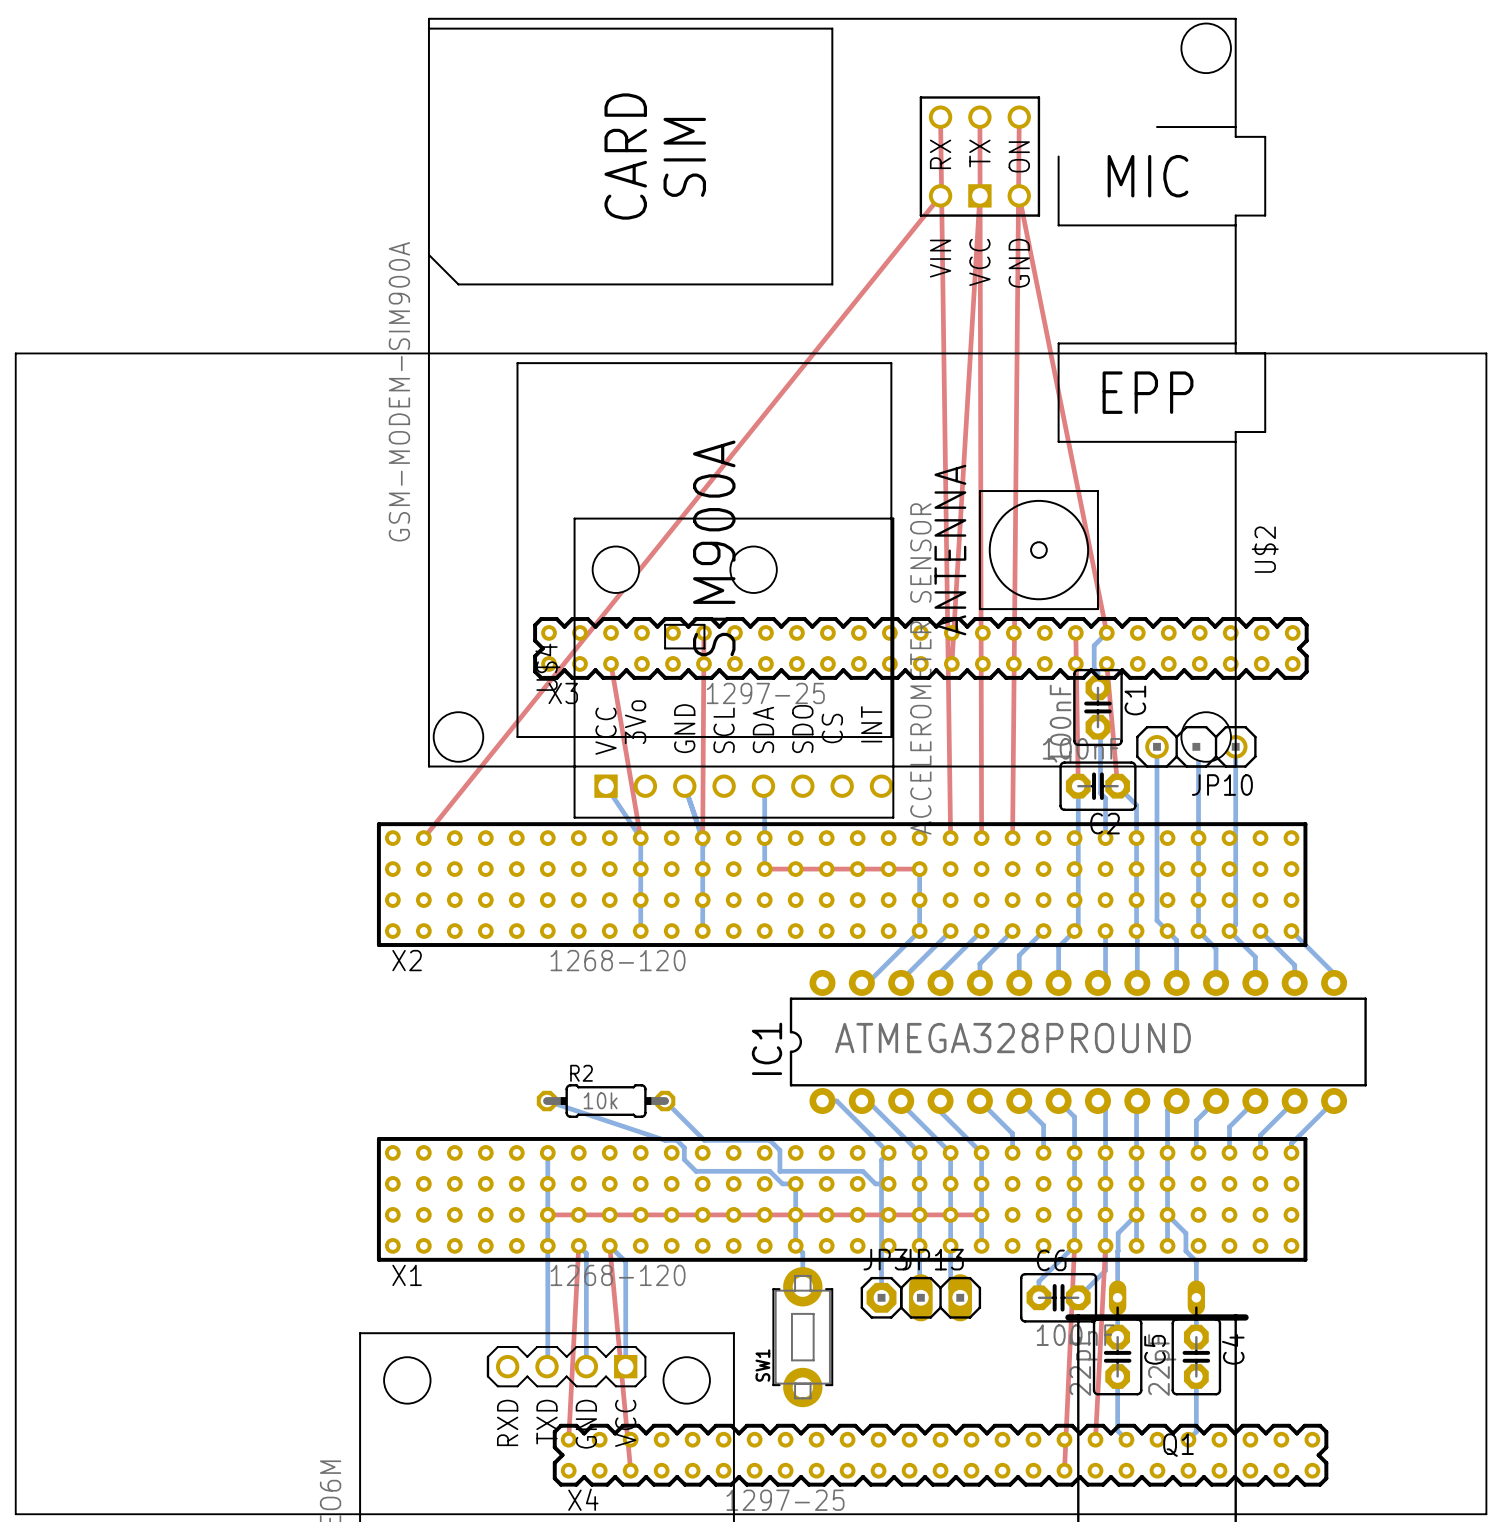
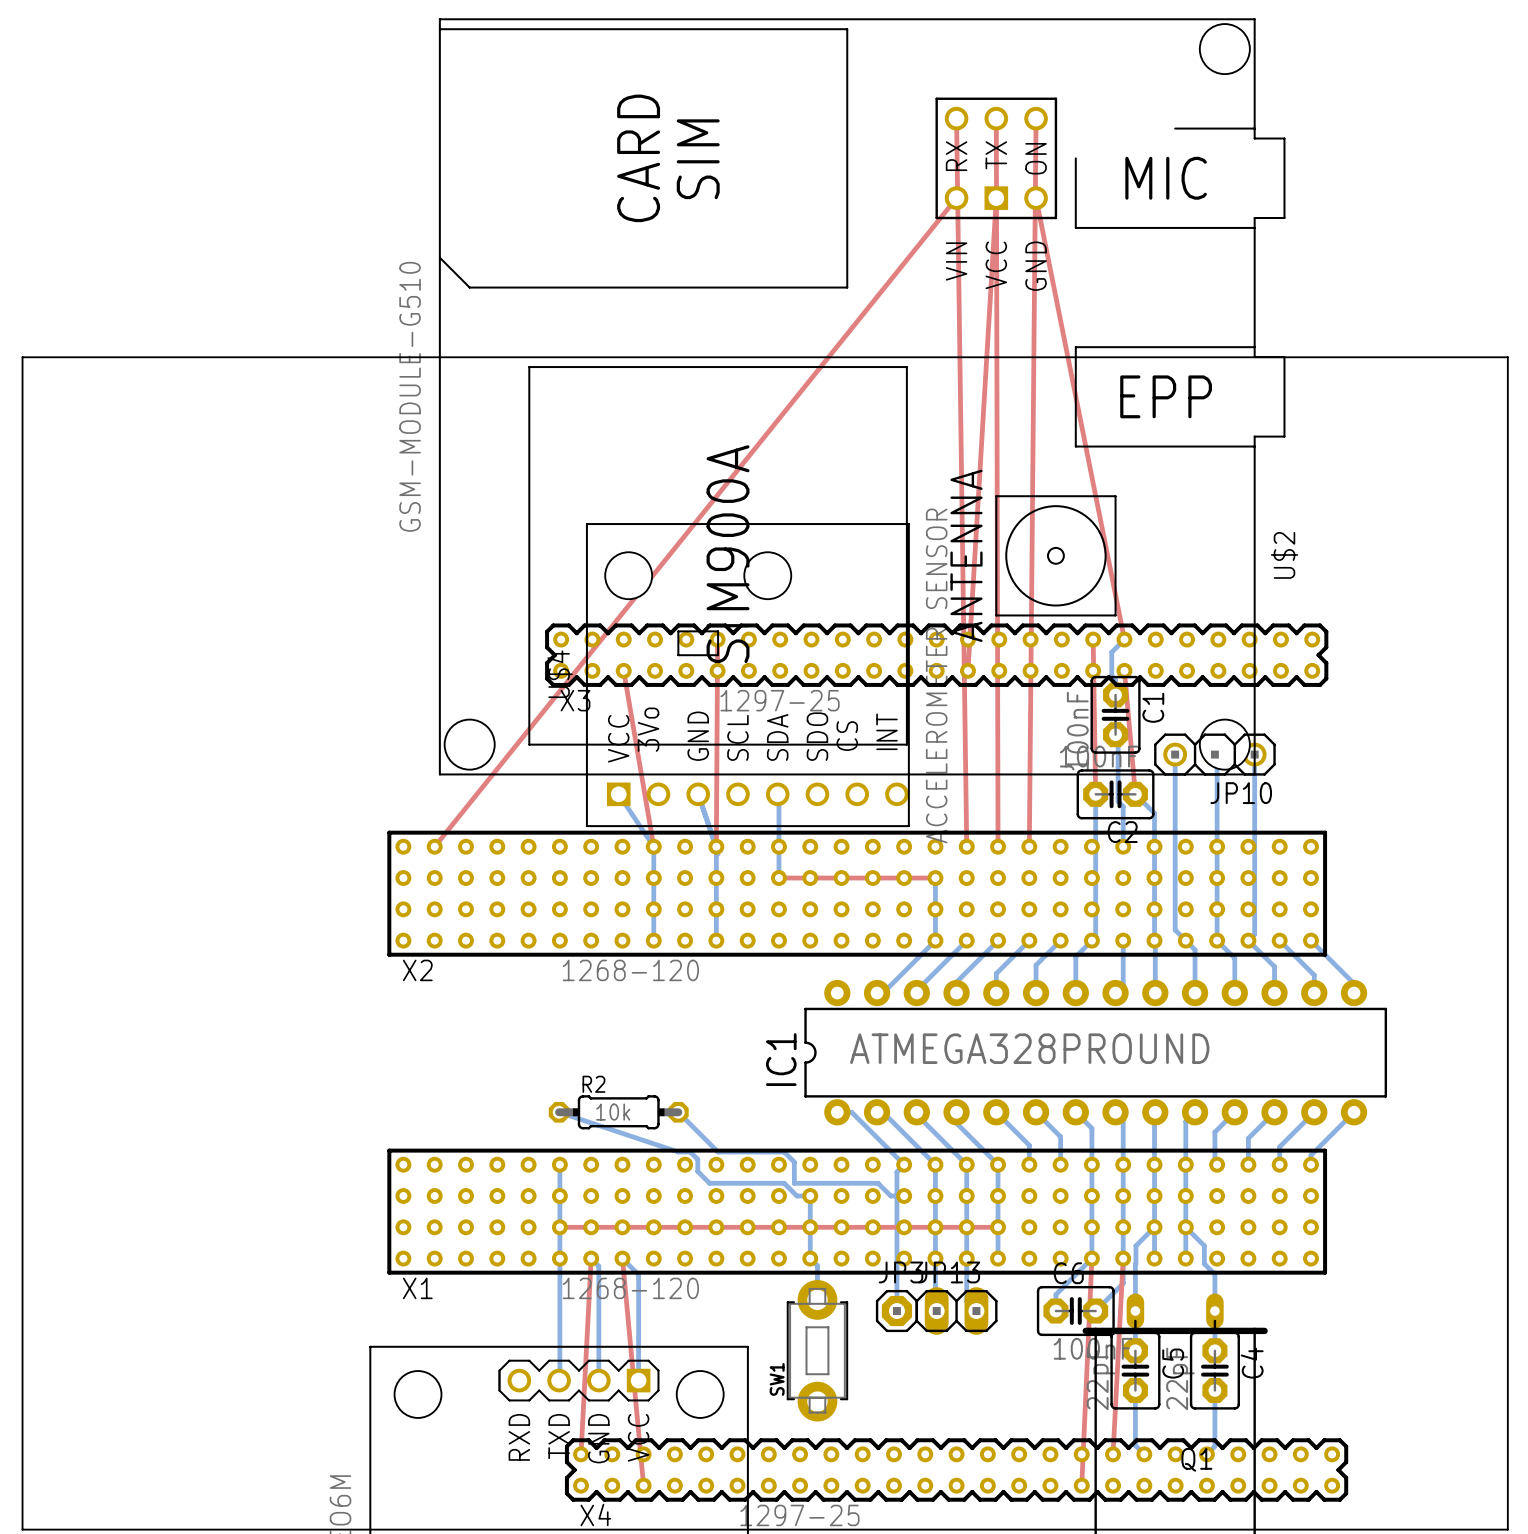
U$2 value: GSM-MODEM-SIM900A (399, 391) -> GSM-MODULE-G510 (410, 396)

